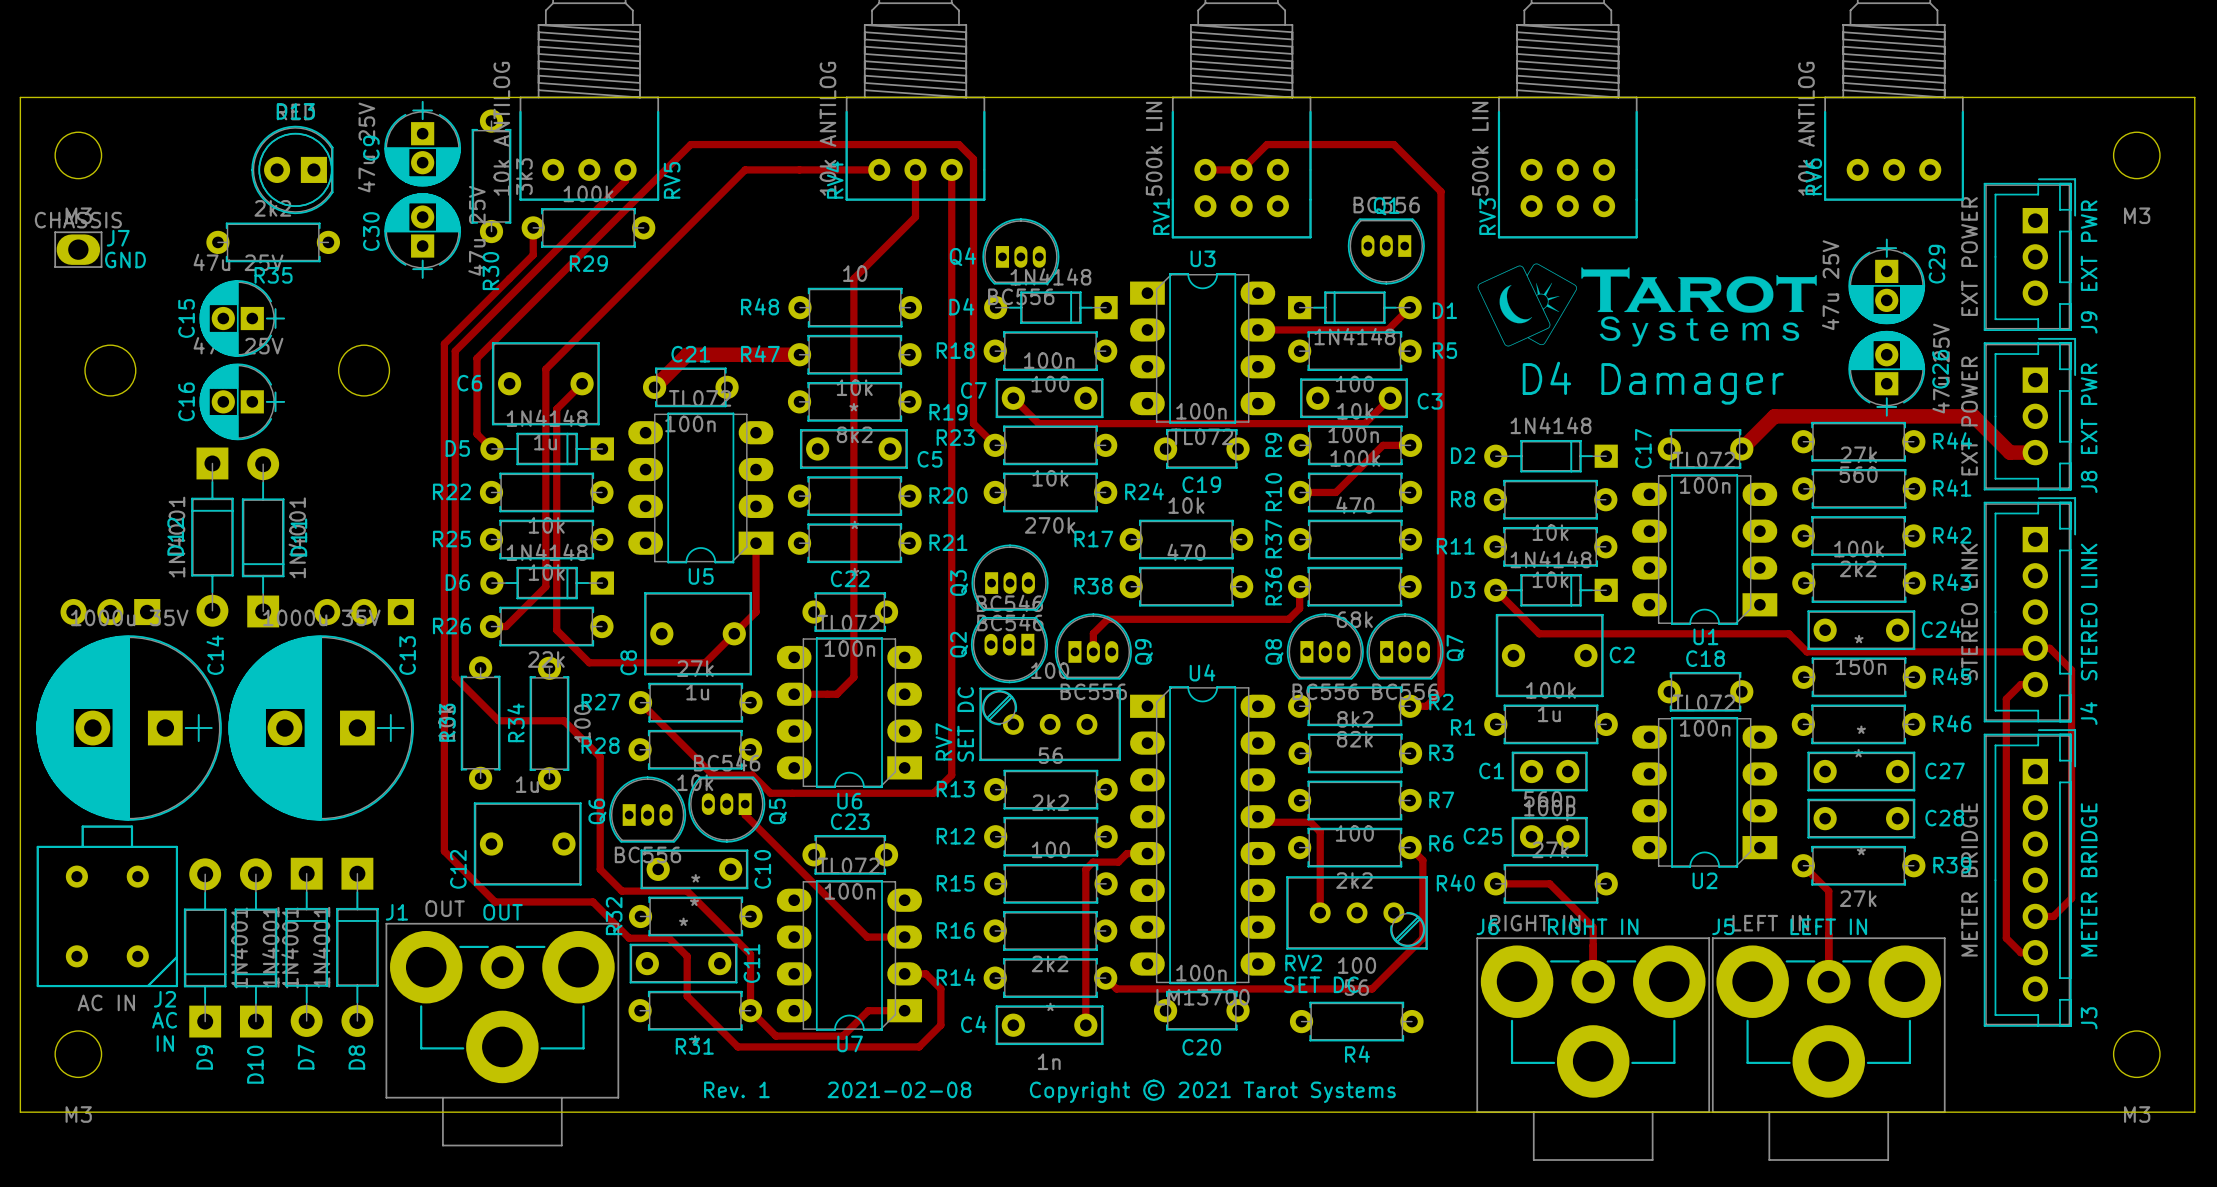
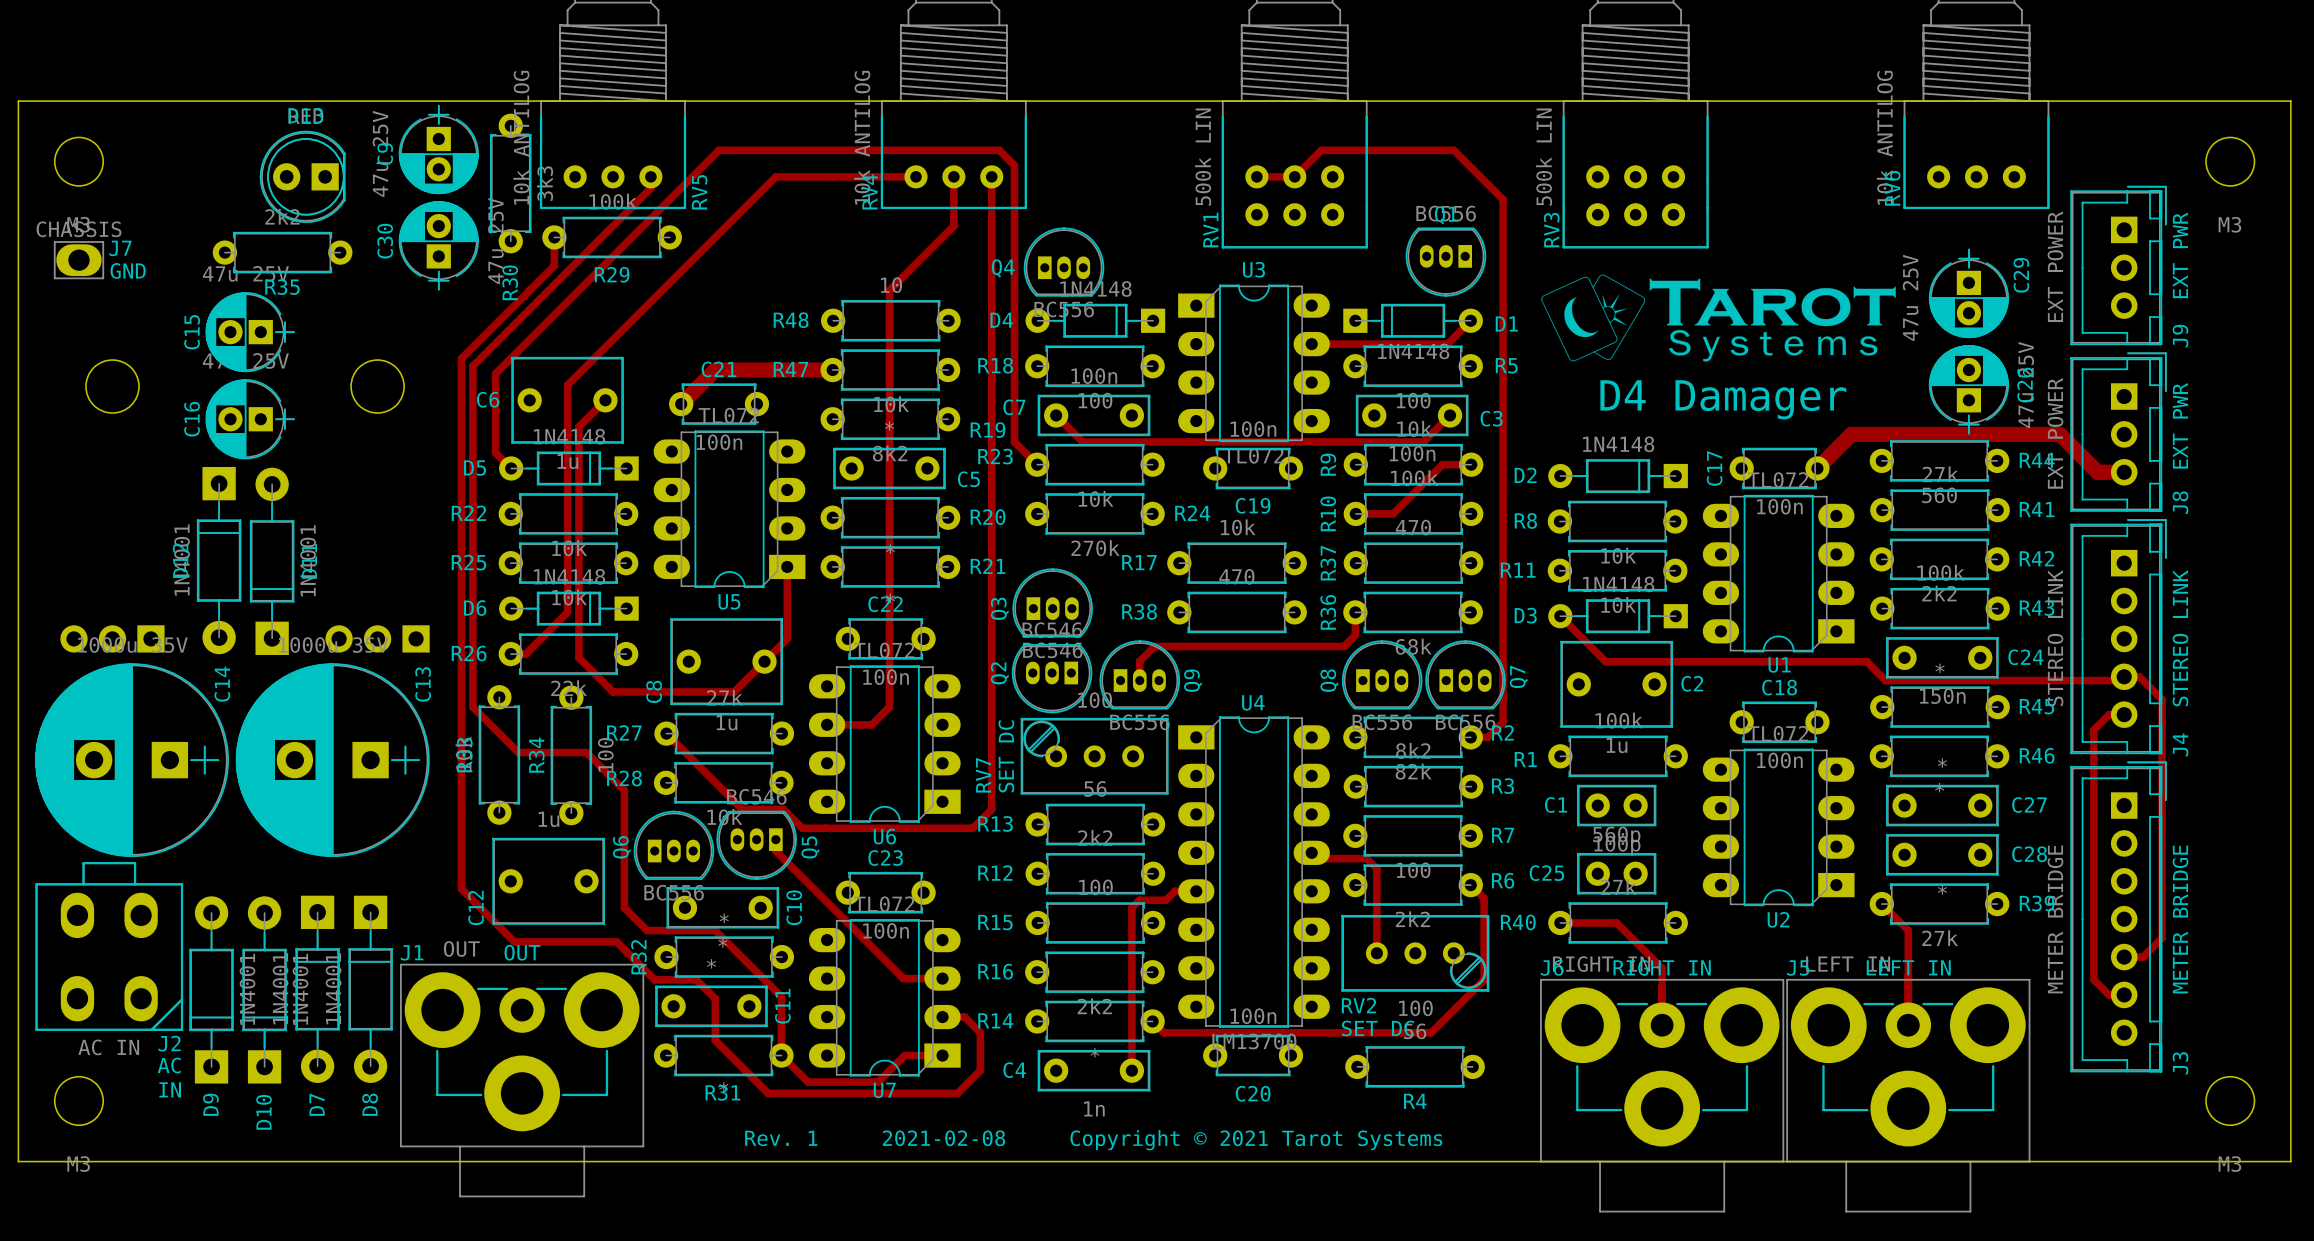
J2 footprint: [36, 825, 179, 988] -> [35, 862, 184, 1031]

